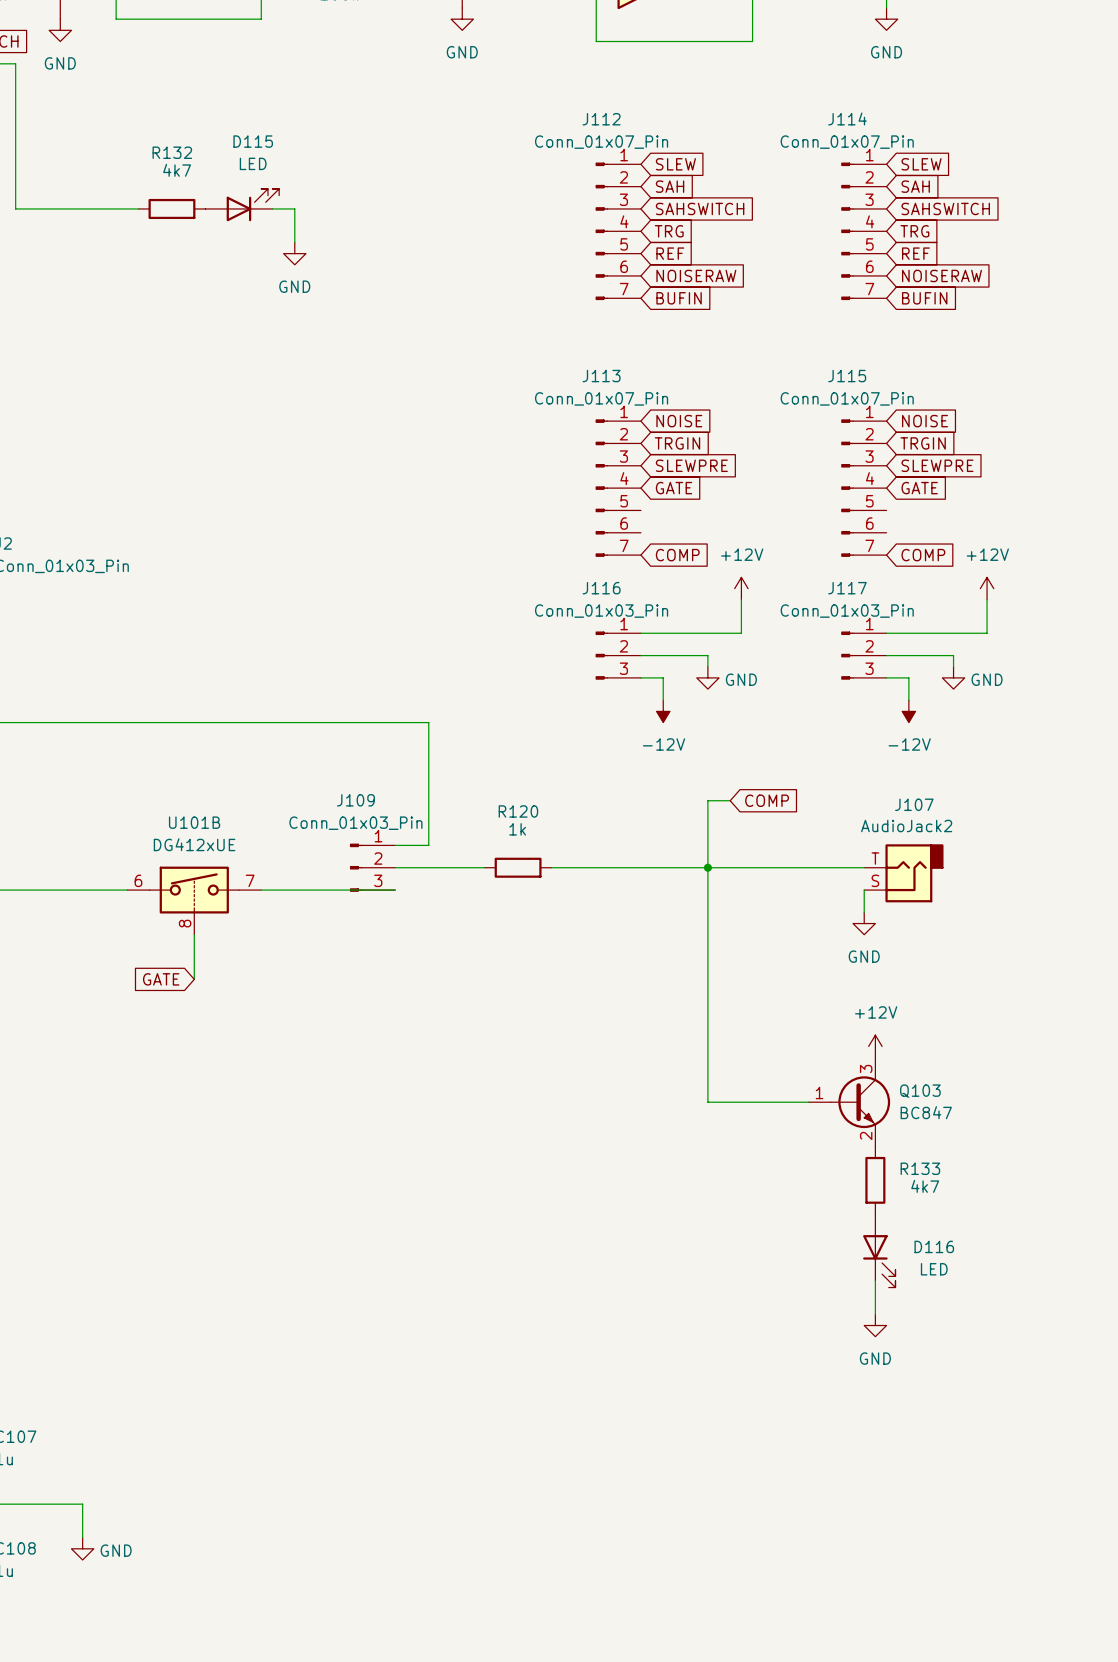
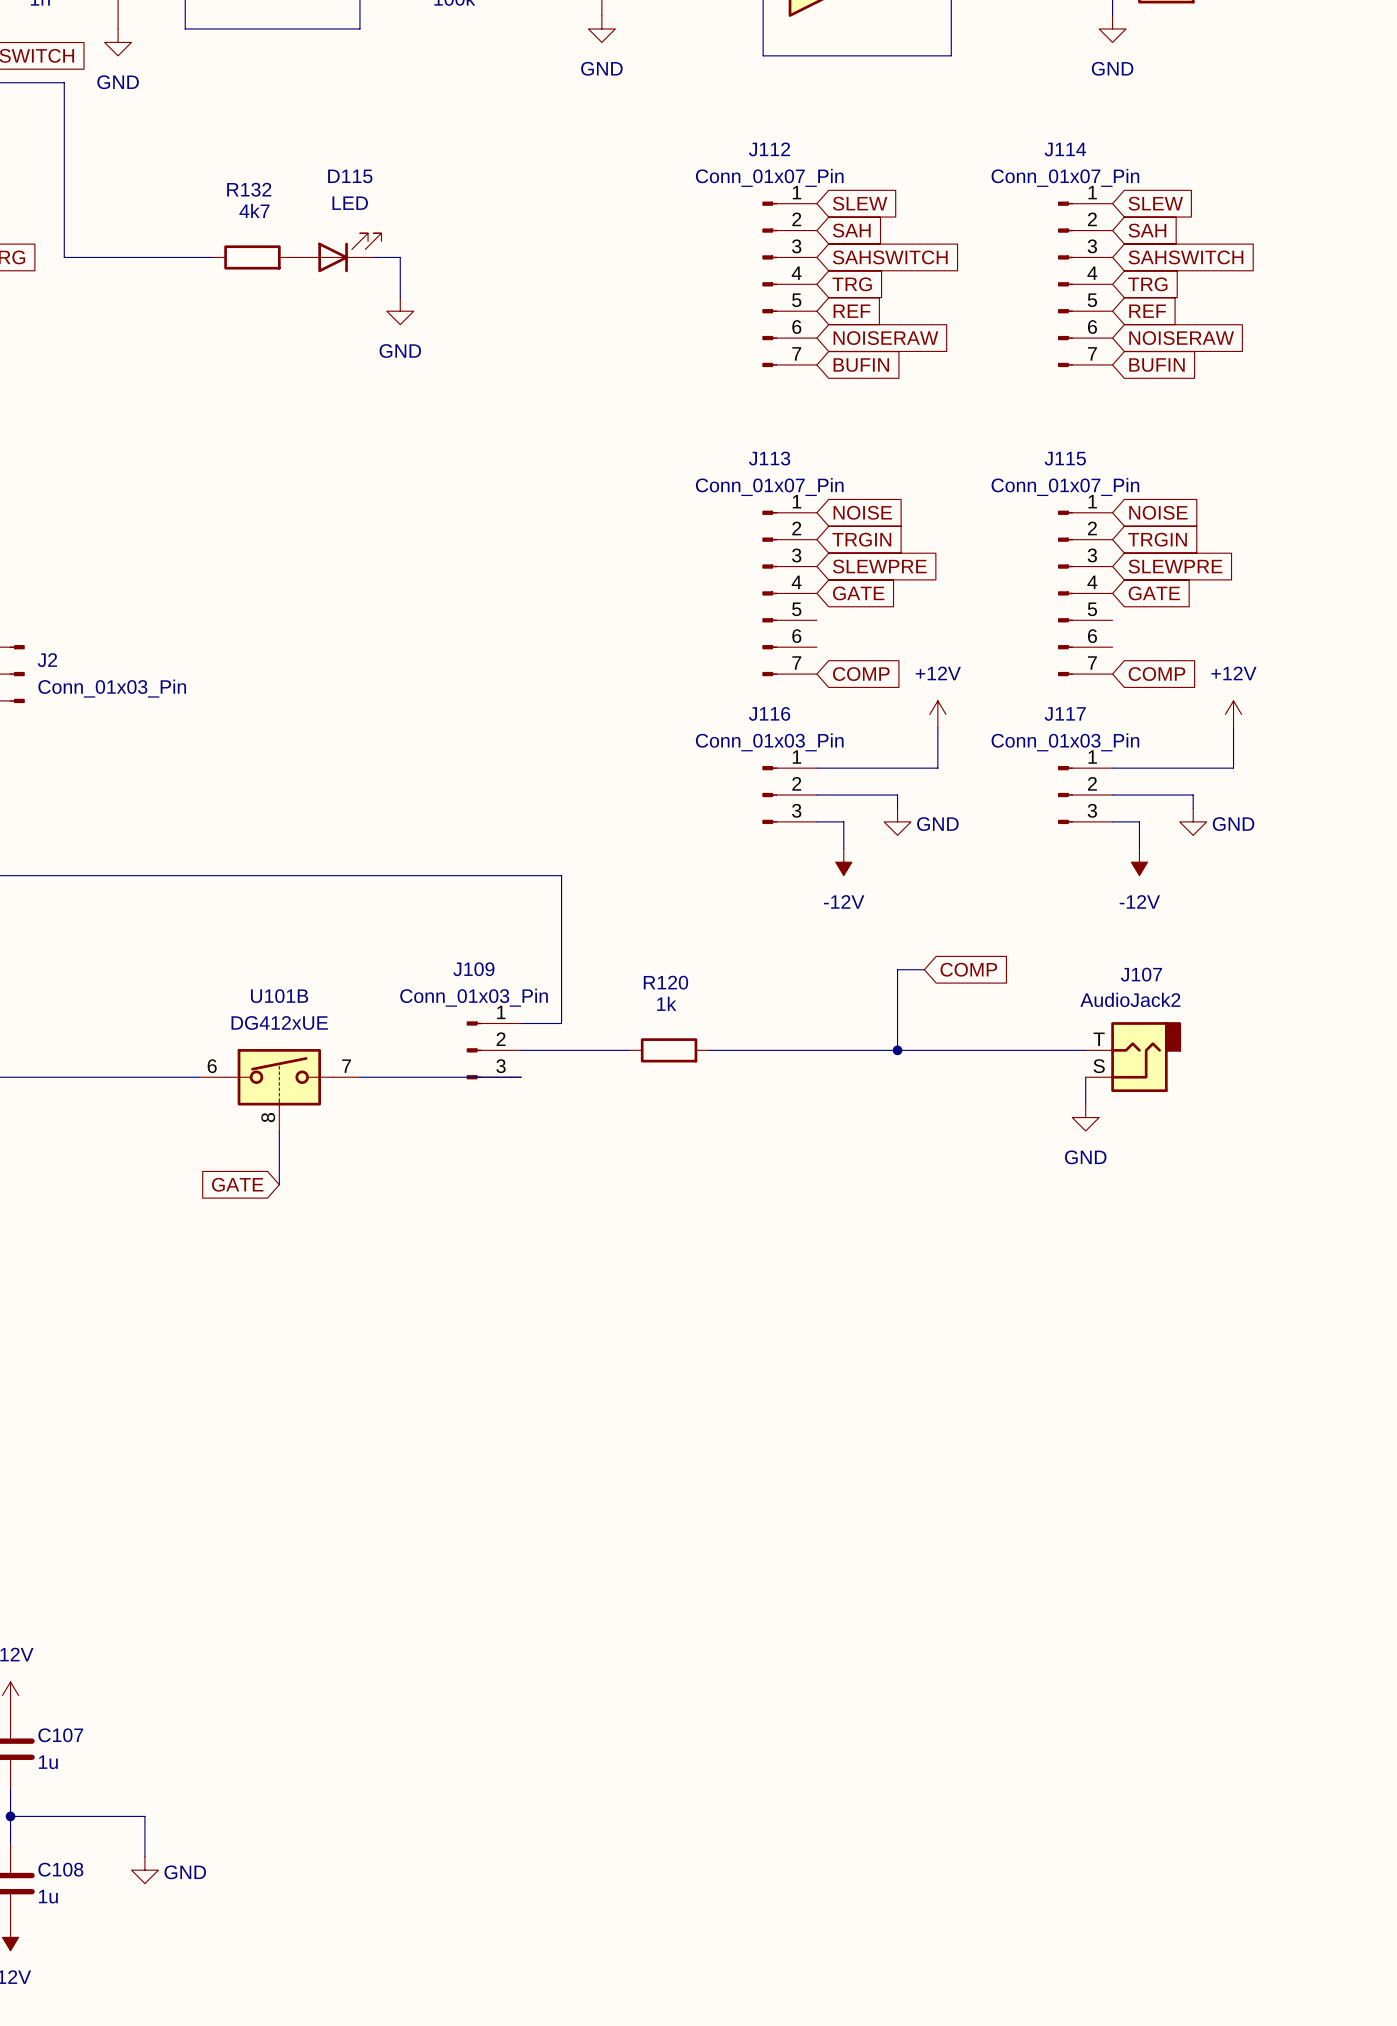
wire: (707, 867) (707, 1102) (808, 1102) -> none
power symbol: +12V (875, 1046) -> none
Q103: BC847 (849, 1102) -> none
R133: 4k7 (875, 1180) -> none
D116: LED (879, 1250) -> none
wire: (875, 1280) (875, 1314) -> none
power symbol: GND (875, 1325) -> none

